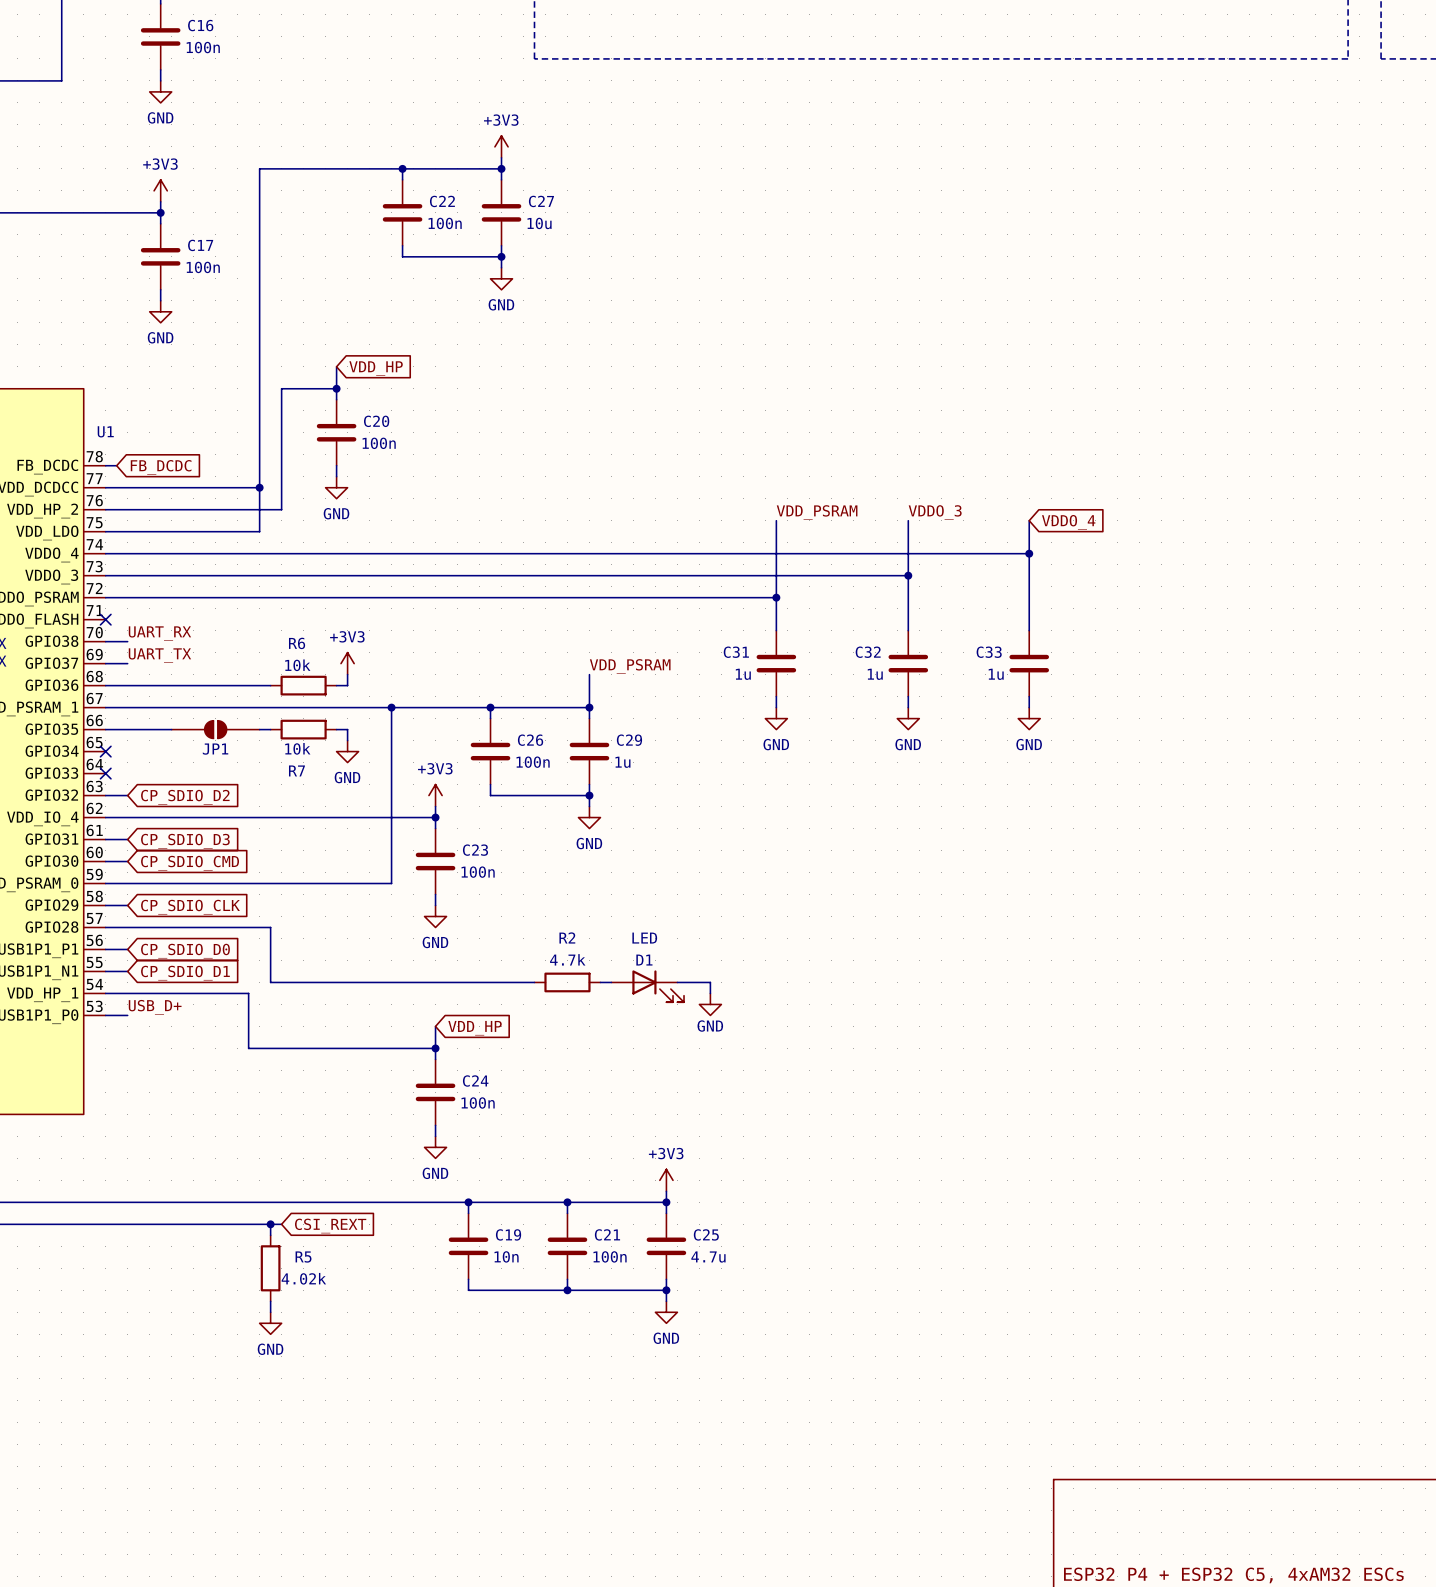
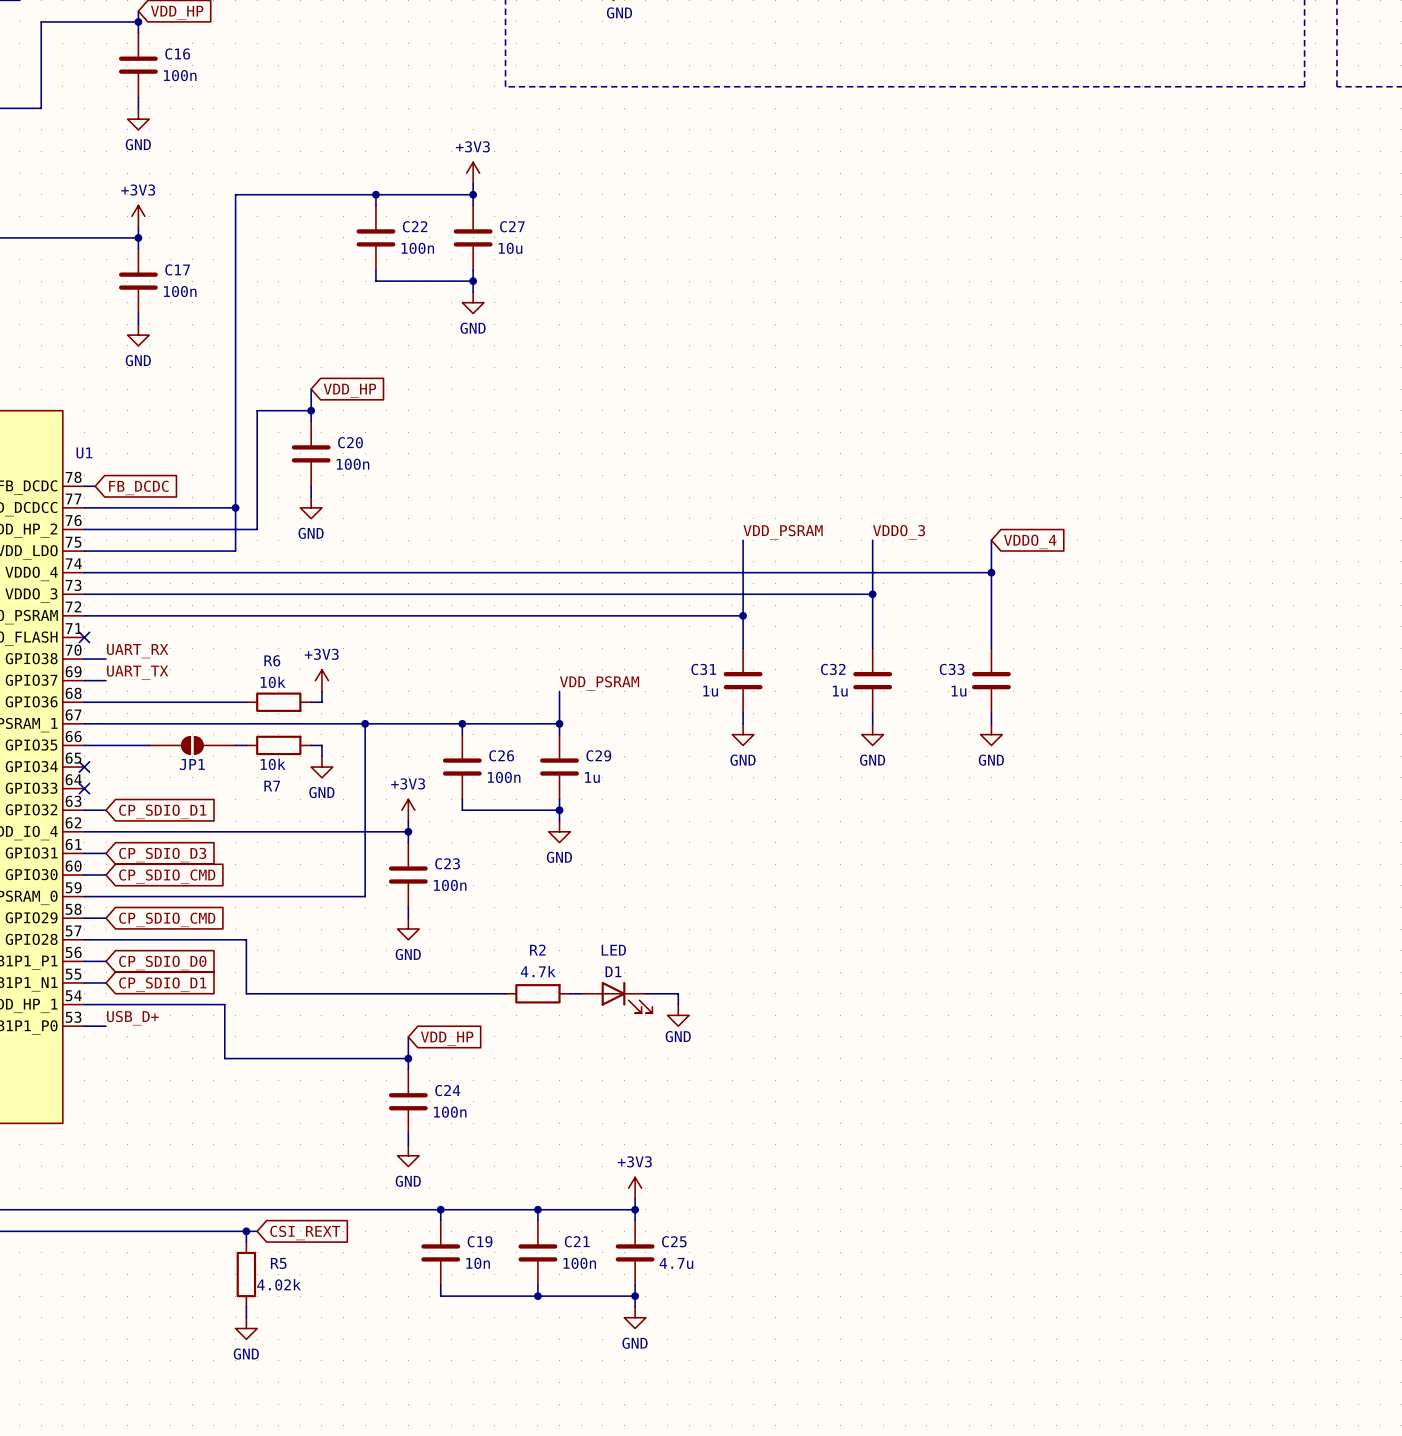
global label: CP_SDIO_D2 (185, 797) -> CP_SDIO_D1 (162, 811)
global label: CP_SDIO_CLK (190, 907) -> CP_SDIO_CMD (167, 919)

